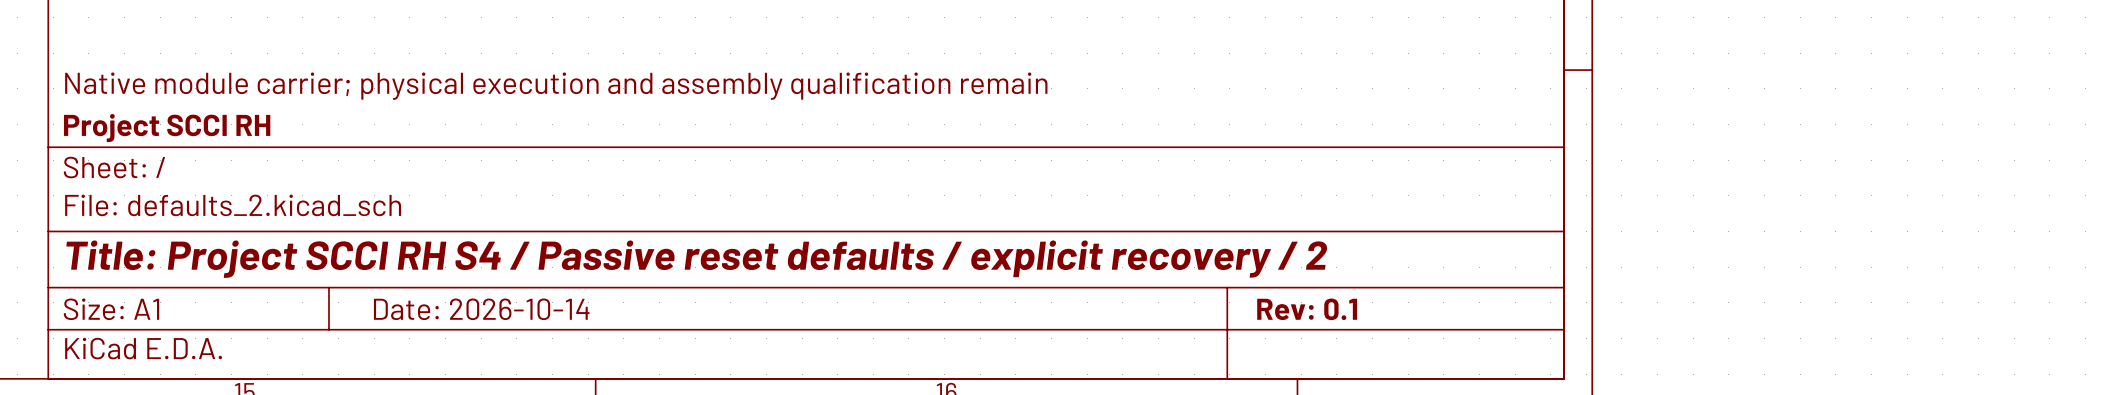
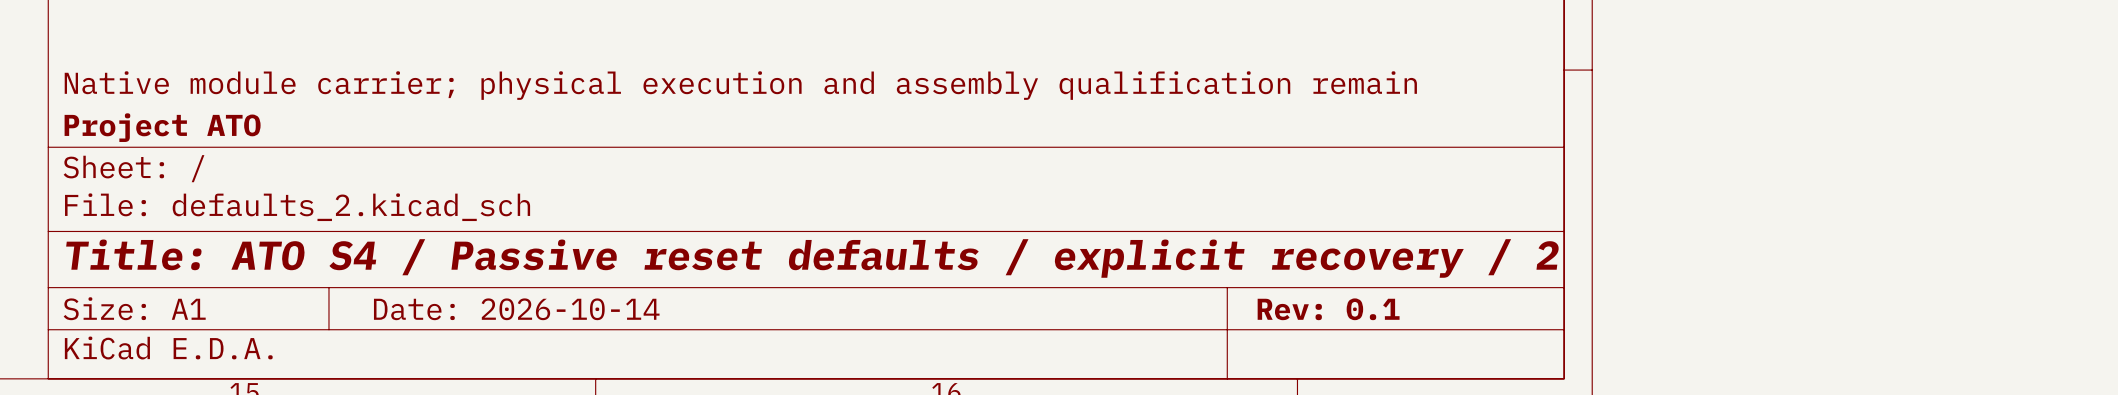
title block: Project SCCI RH (167, 128) -> Project ATO (162, 127)
title block: Title: Project SCCI RH S4 / Passive reset defaults / explicit recovery / 2 (696, 259) -> Title: ATO S4 / Passive reset defaults / explicit recovery / 2 (812, 258)

